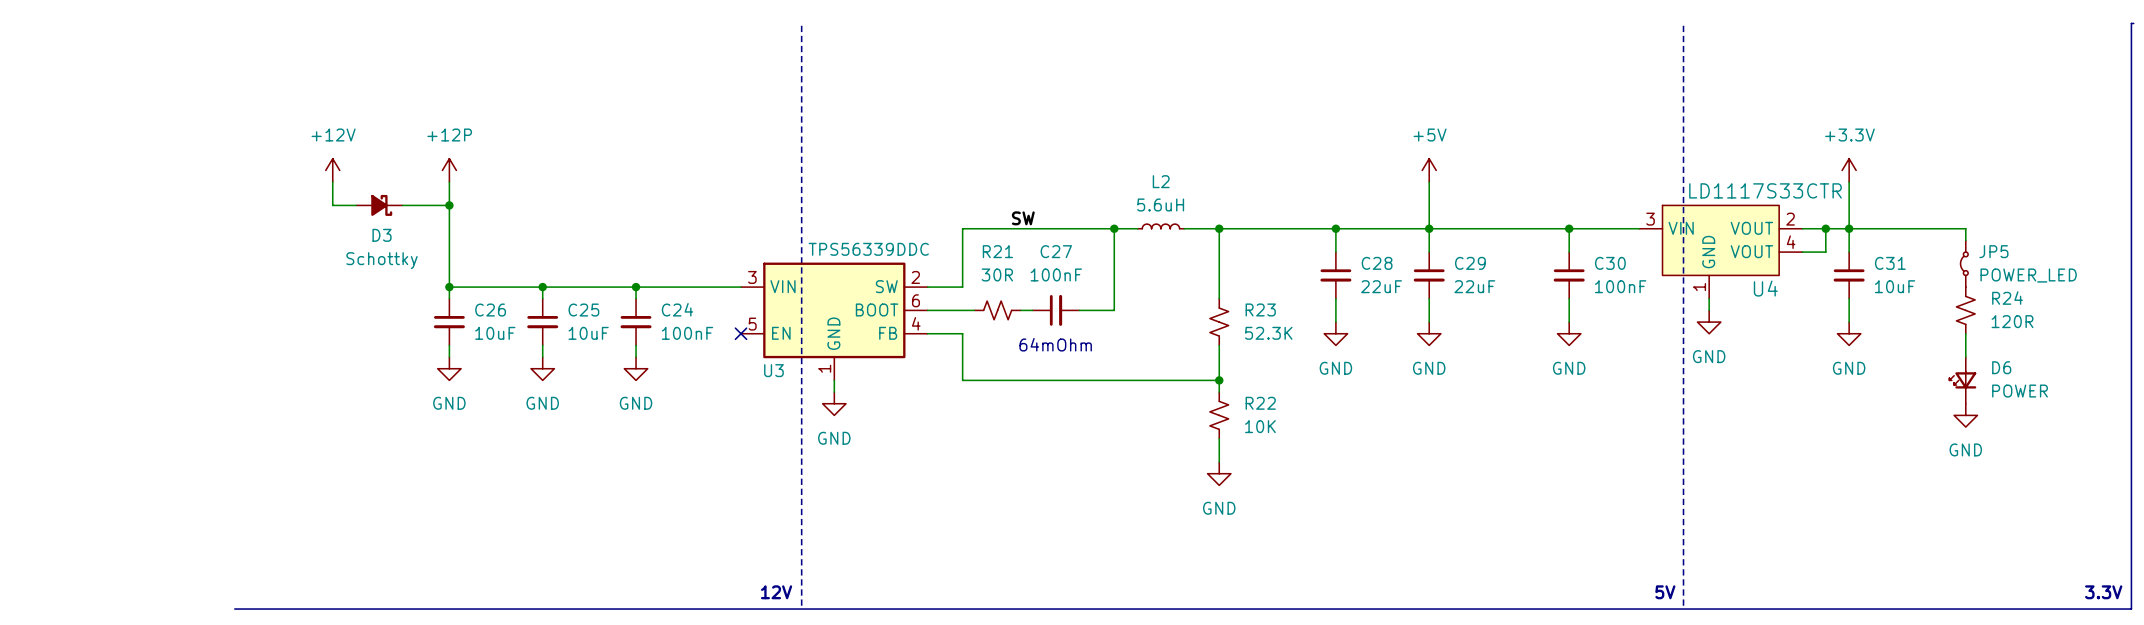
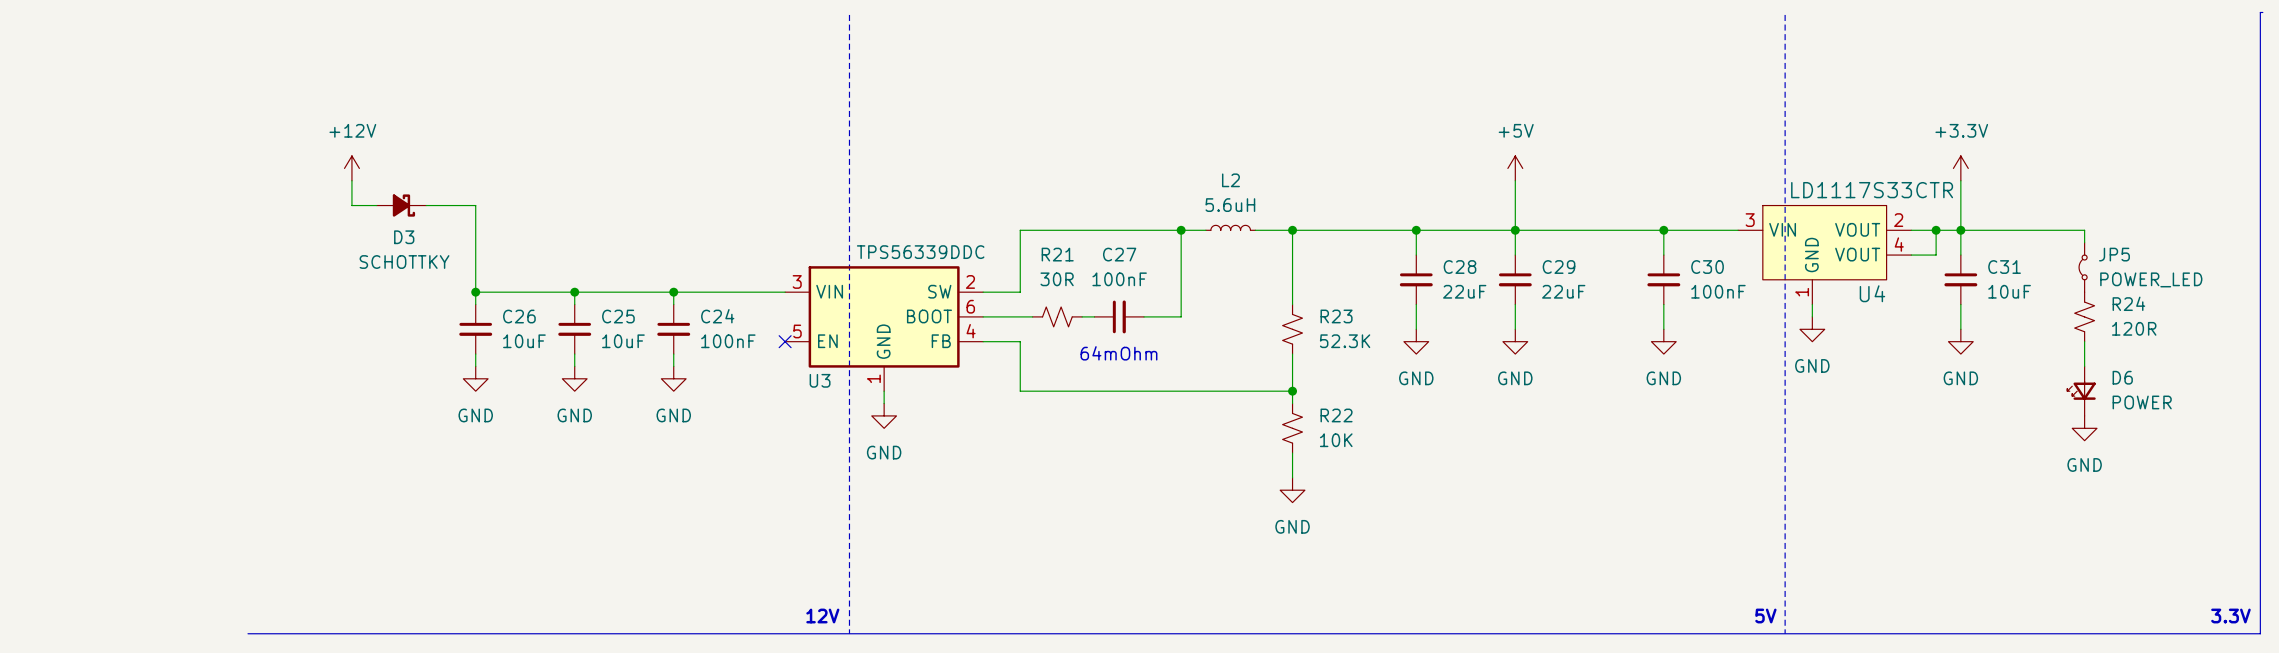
power symbol: +12P (449, 170) -> none
wire: (449, 182) (449, 205) -> none
junction: (449, 205) -> none
label: SW (1023, 218) -> none
D3 value: Schottky (382, 260) -> SCHOTTKY (404, 262)

